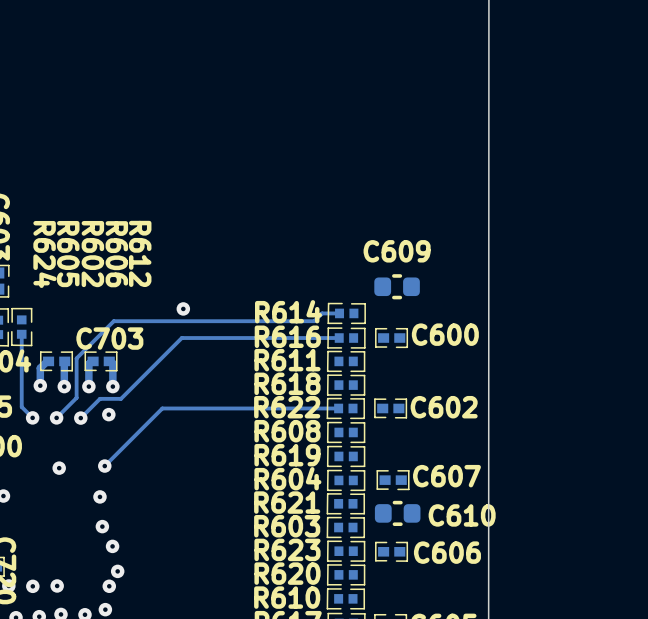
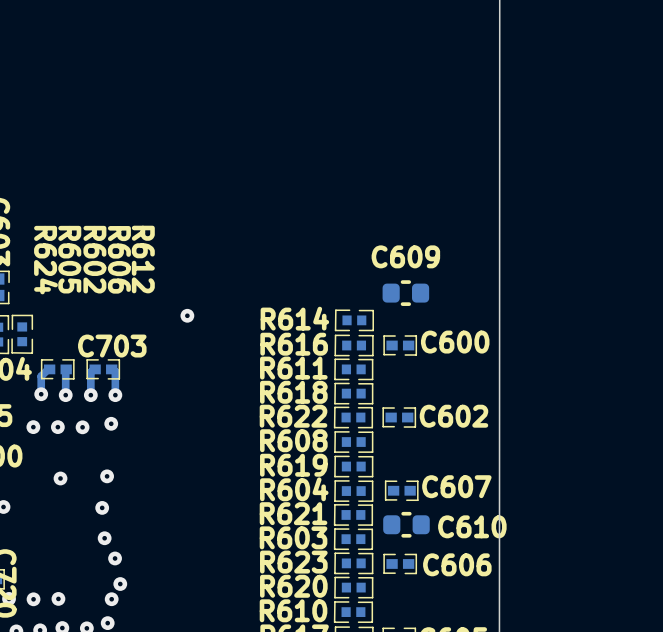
track: (339, 313) (322, 313) (314, 321) (113, 321) (76, 358) (76, 397) (56, 417) -> none
track: (21, 334) (21, 406) (32, 417) -> none
track: (339, 338) (181, 338) (120, 398) (100, 398) (80, 418) -> none
track: (338, 408) (162, 408) (104, 466) -> none

